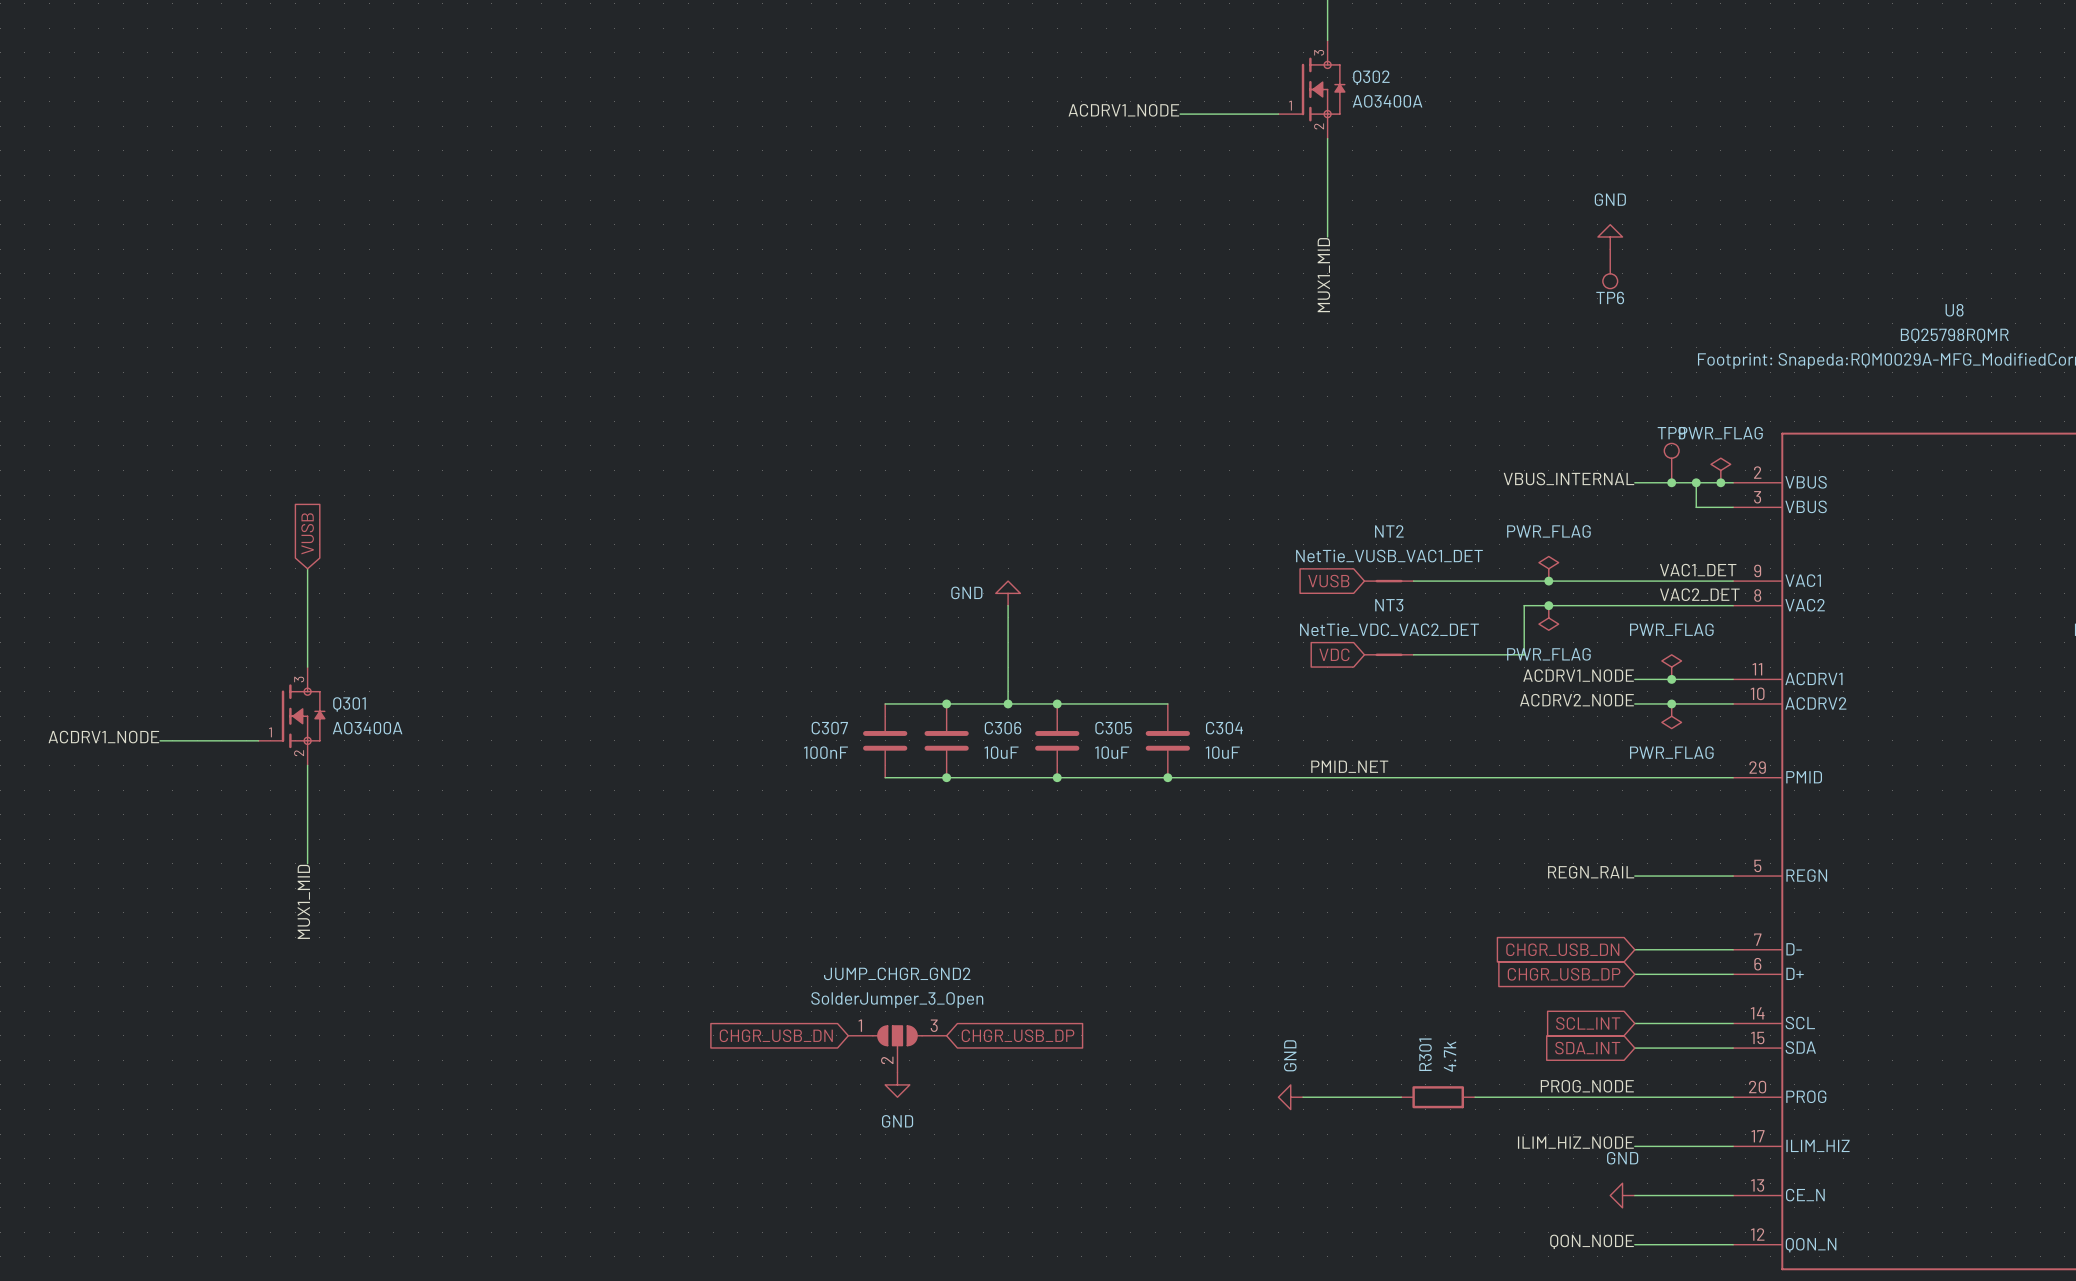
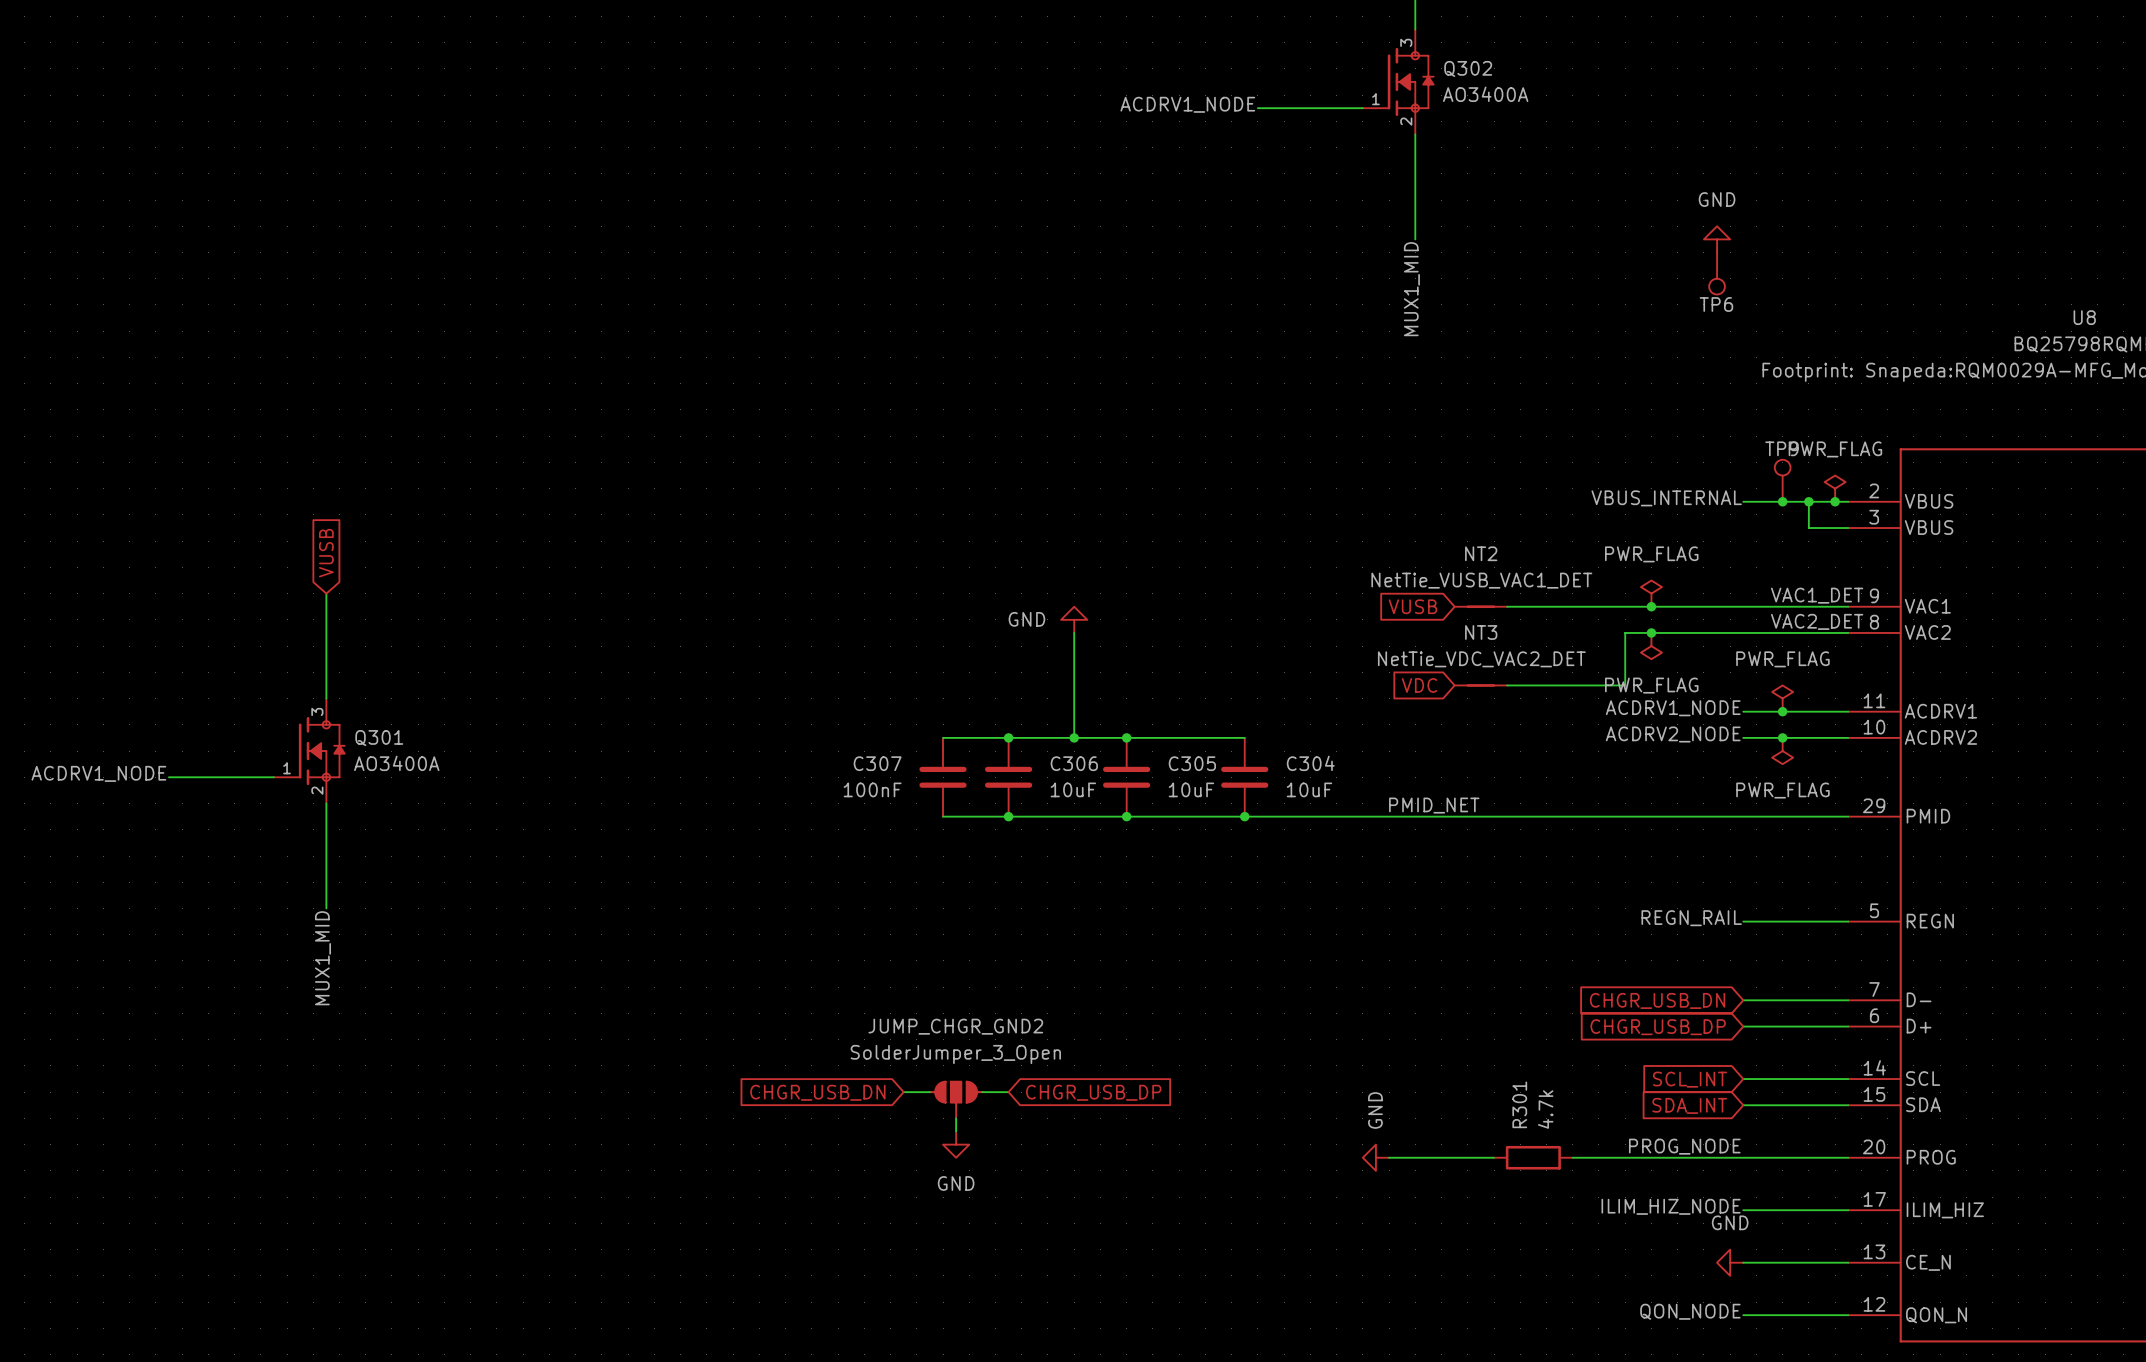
JUMP_CHGR_GND2 symbol: [848, 1025, 947, 1073] -> [929, 1081, 983, 1119]

